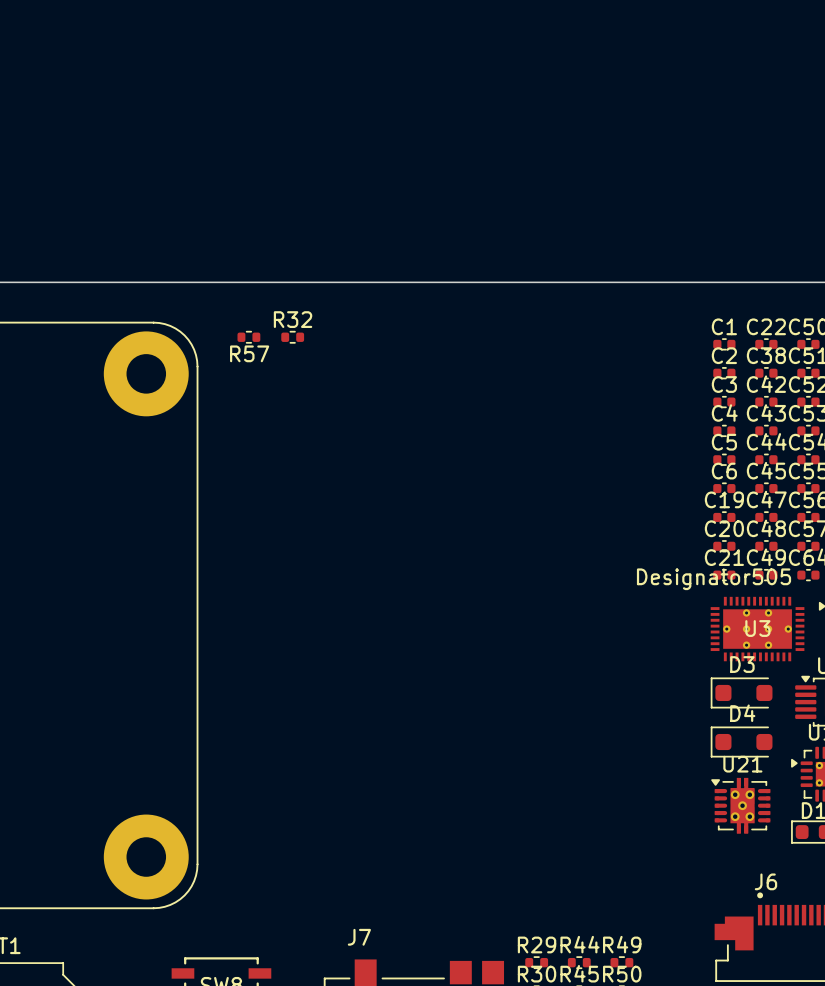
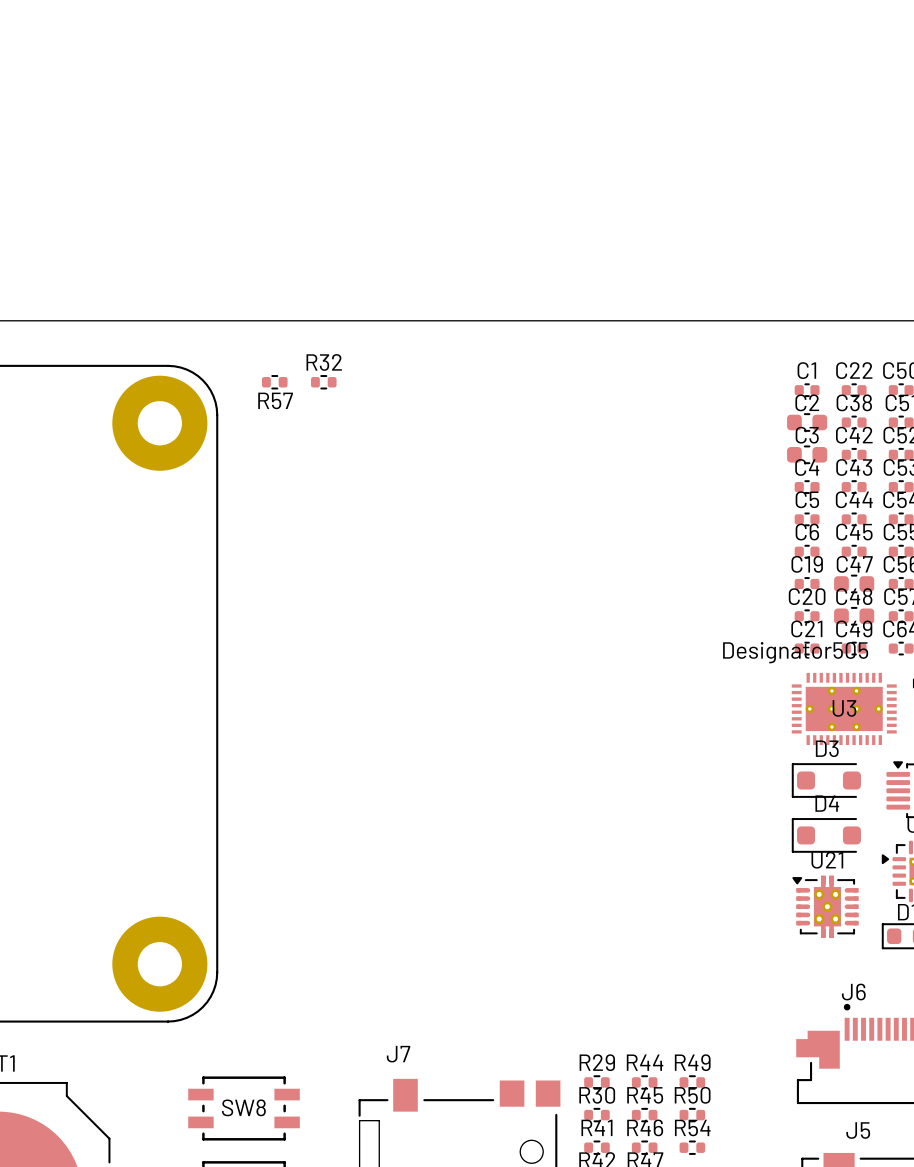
C2 footprint: [713, 367, 736, 380] -> [787, 413, 828, 432]
C3 footprint: [713, 395, 736, 409] -> [787, 445, 828, 465]
C47 footprint: [755, 511, 778, 524] -> [834, 574, 875, 594]
C48 footprint: [755, 540, 778, 553] -> [834, 606, 875, 626]

